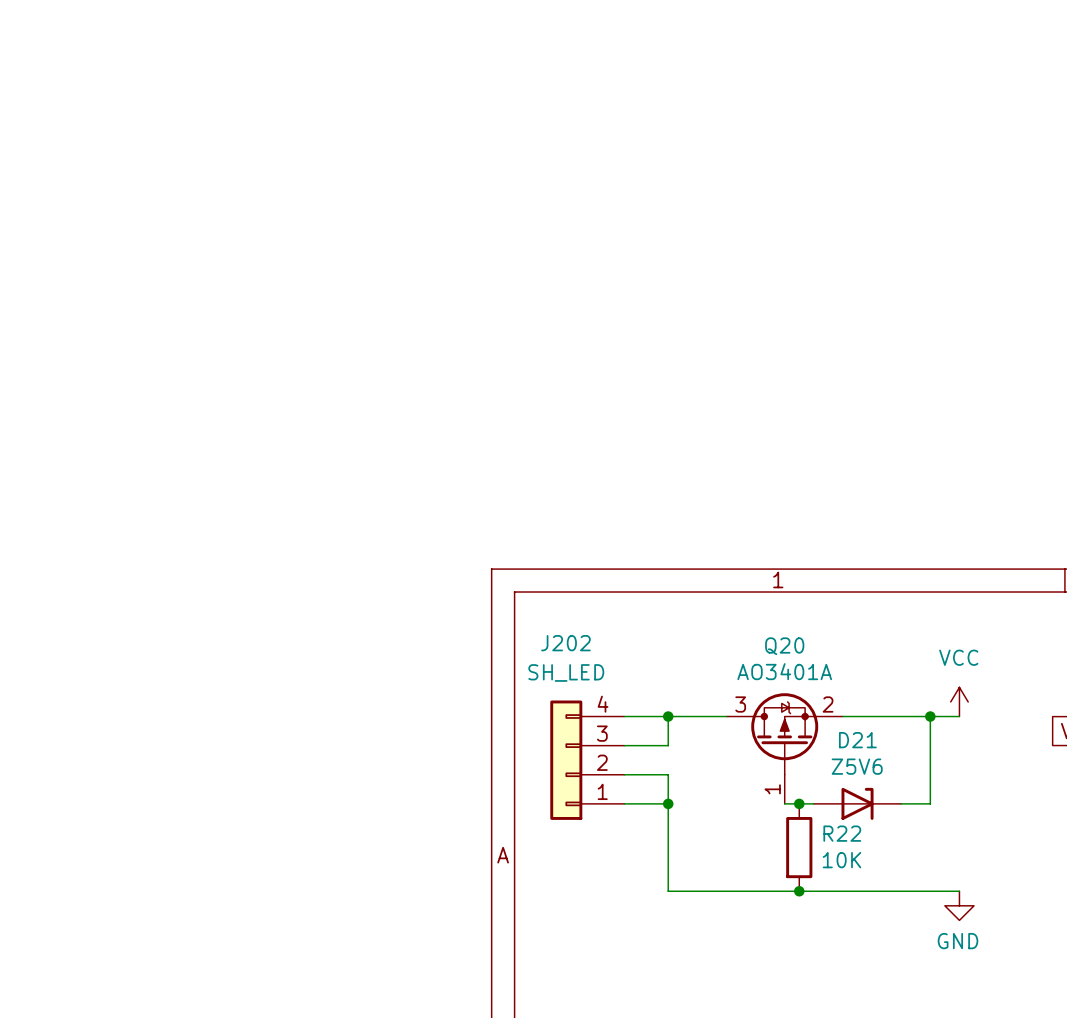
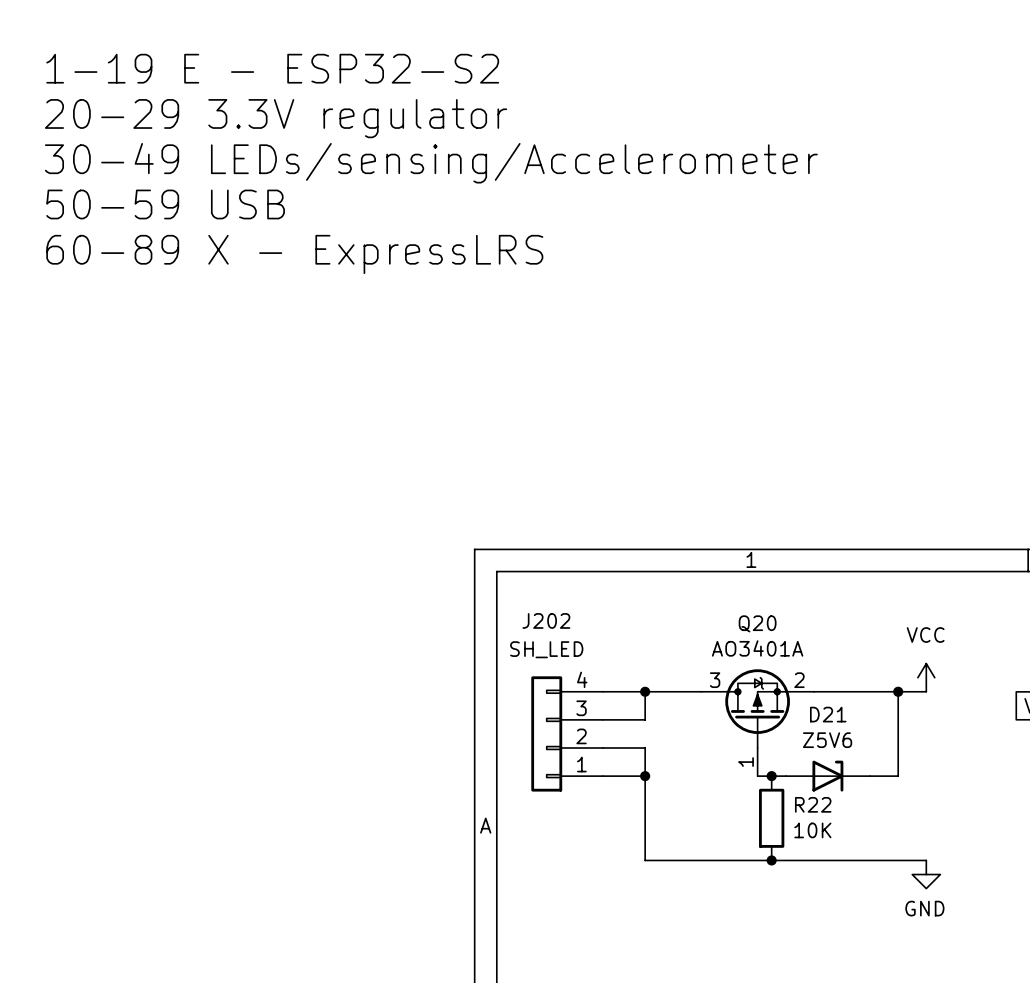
text: none -> 1-19 E - ESP32-S2 (272, 68)
text: none -> 20-29 3.3V regulator (276, 118)
text: none -> 30-49 LEDs/sensing/Accelerometer (431, 163)
text: none -> 50-59 USB (165, 204)
text: none -> 60-89 X - ExpressLRS (294, 254)

